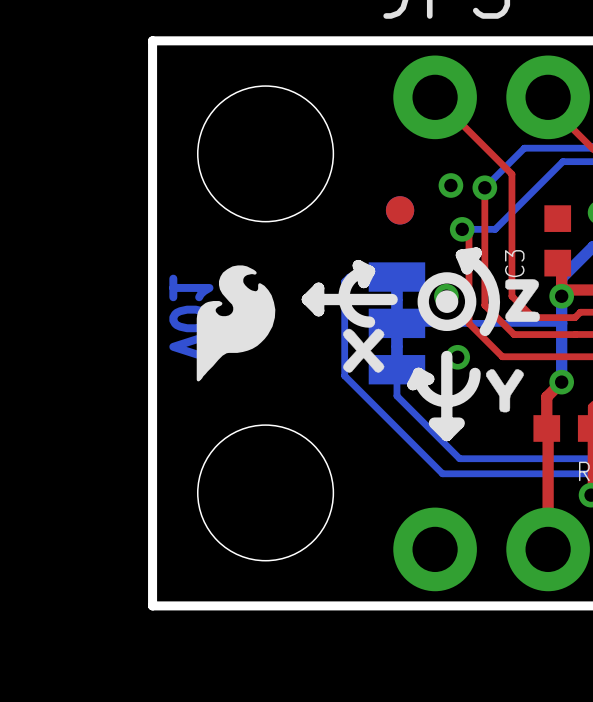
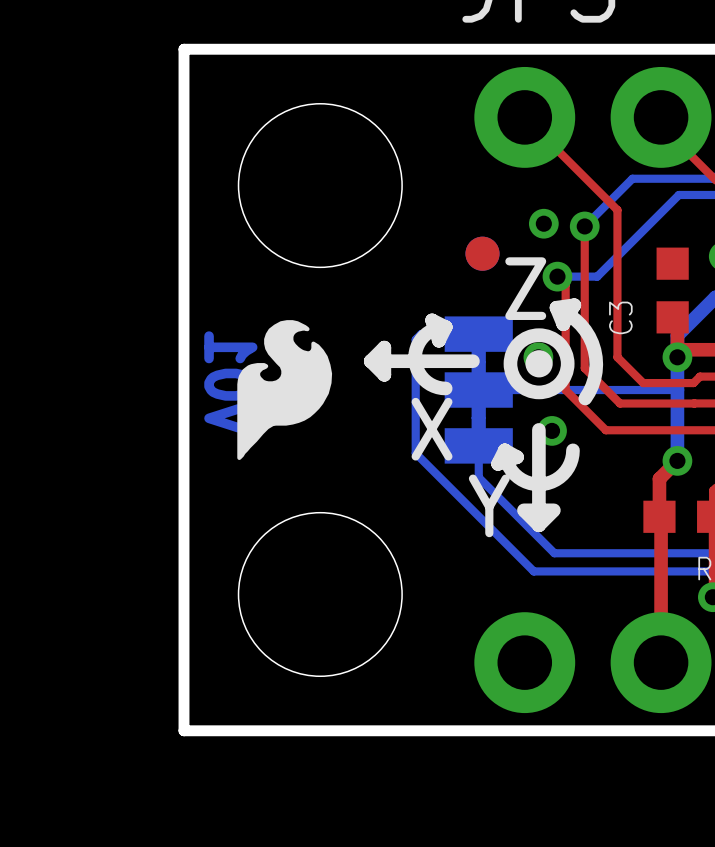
text: none -> Z (525, 288)
drawing: [486, 279, 540, 413] -> none
drawing: [343, 328, 385, 373] -> none
text: none -> X (432, 429)
text: none -> Y (489, 505)

